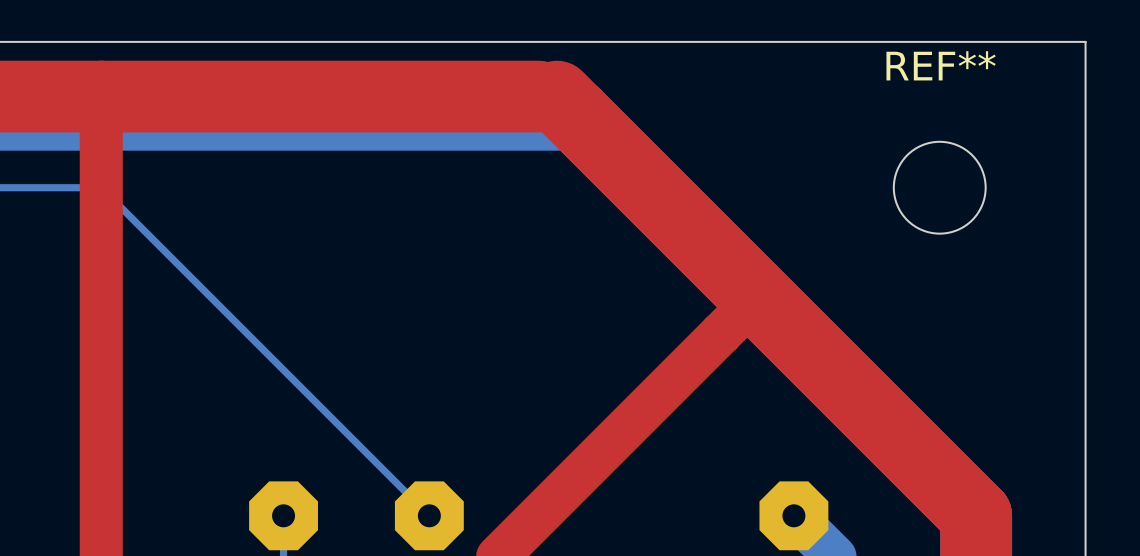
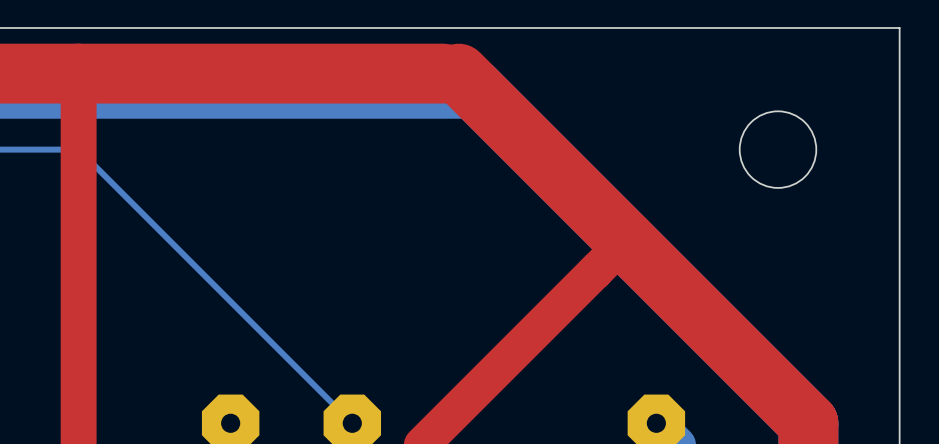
REF** name: REF** (941, 65) -> none

